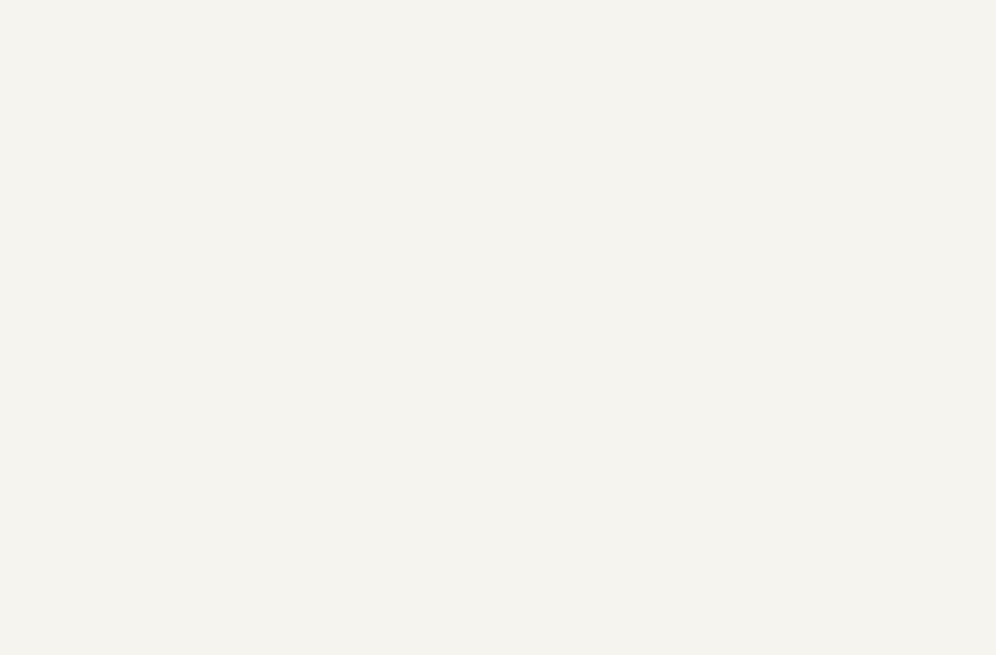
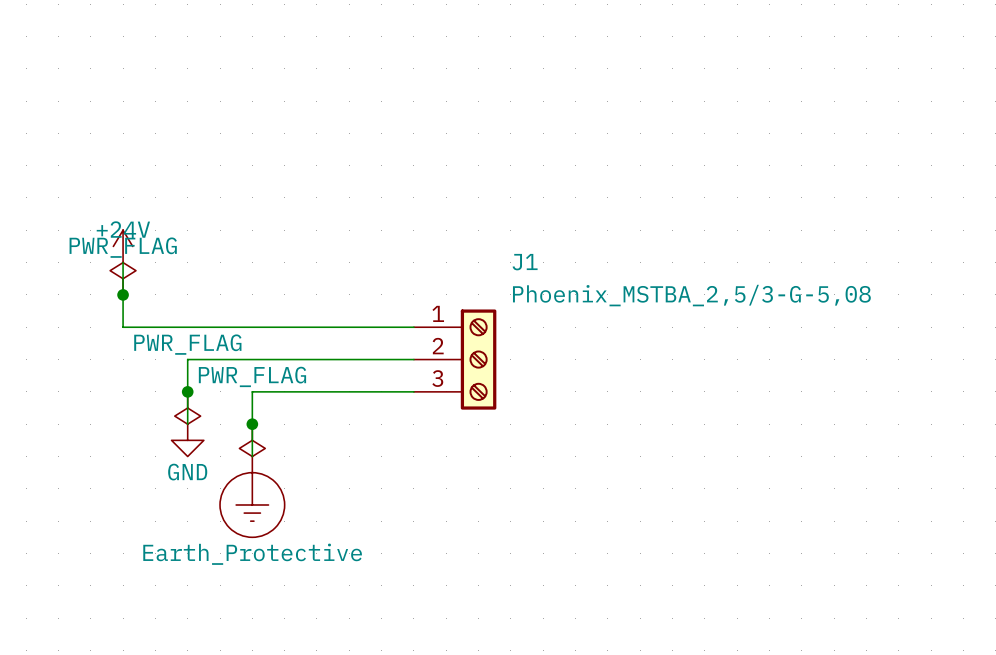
power symbol: none -> +24V (123, 246)
wire: none -> (123, 262) (123, 327) (413, 327)
power symbol: none -> PWR_FLAG (123, 278)
junction: none -> (123, 294)
wire: none -> (413, 359) (187, 359) (187, 424)
J1: none -> Phoenix_MSTBA_2,5/3-G-5,08 (455, 359)
junction: none -> (187, 391)
wire: none -> (413, 391) (252, 391) (252, 456)
power symbol: none -> PWR_FLAG (187, 408)
junction: none -> (252, 424)
power symbol: none -> GND (187, 440)
power symbol: none -> PWR_FLAG (252, 440)
power symbol: none -> Earth_Protective (252, 496)

